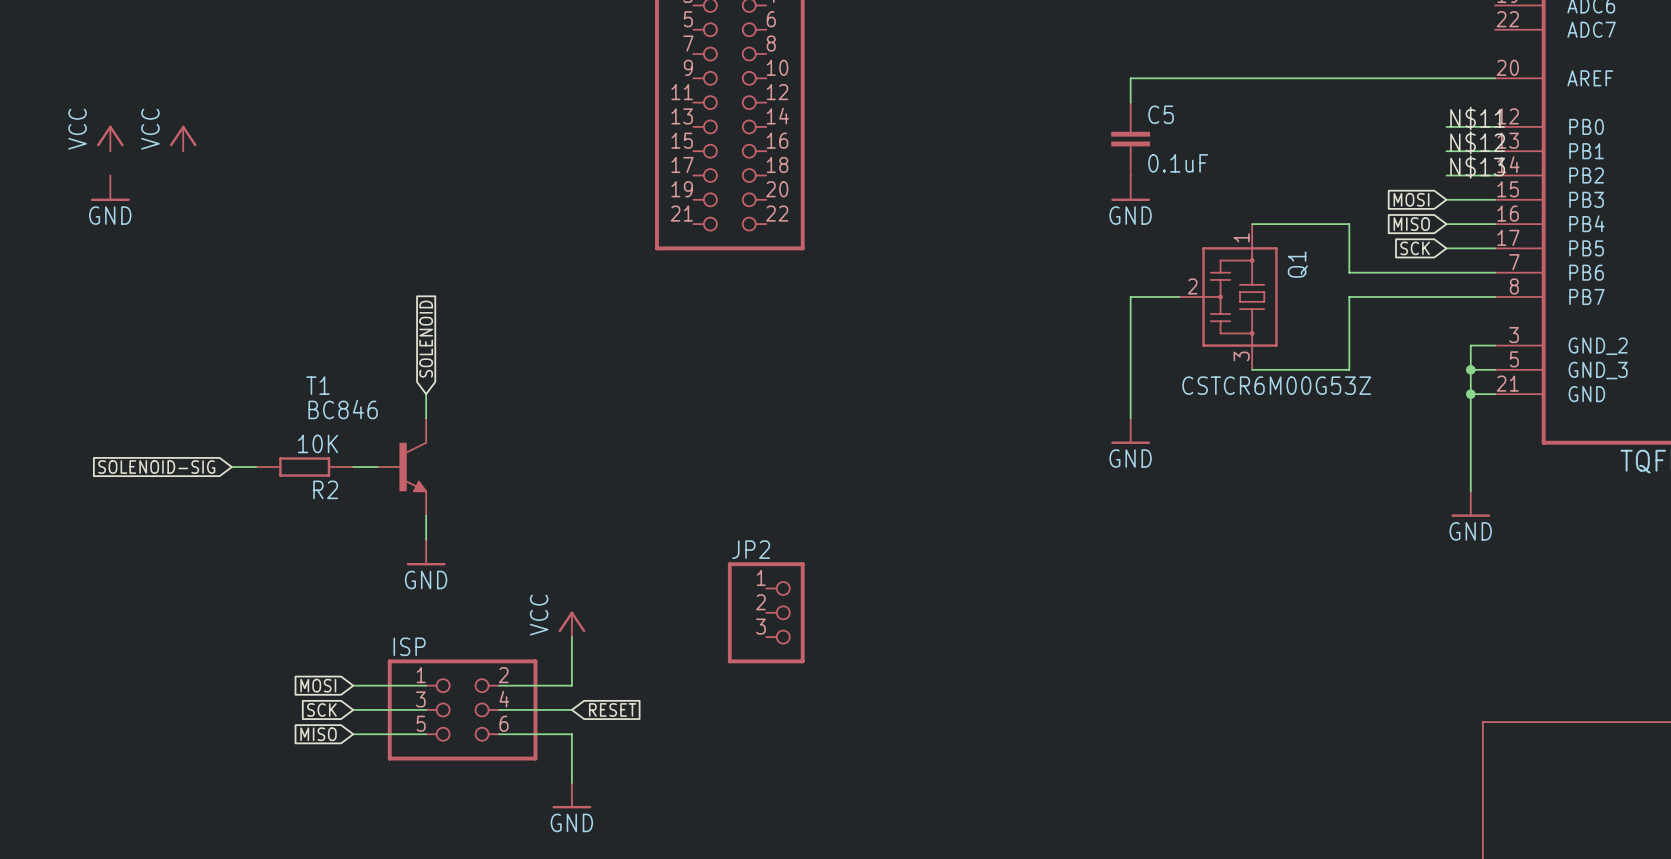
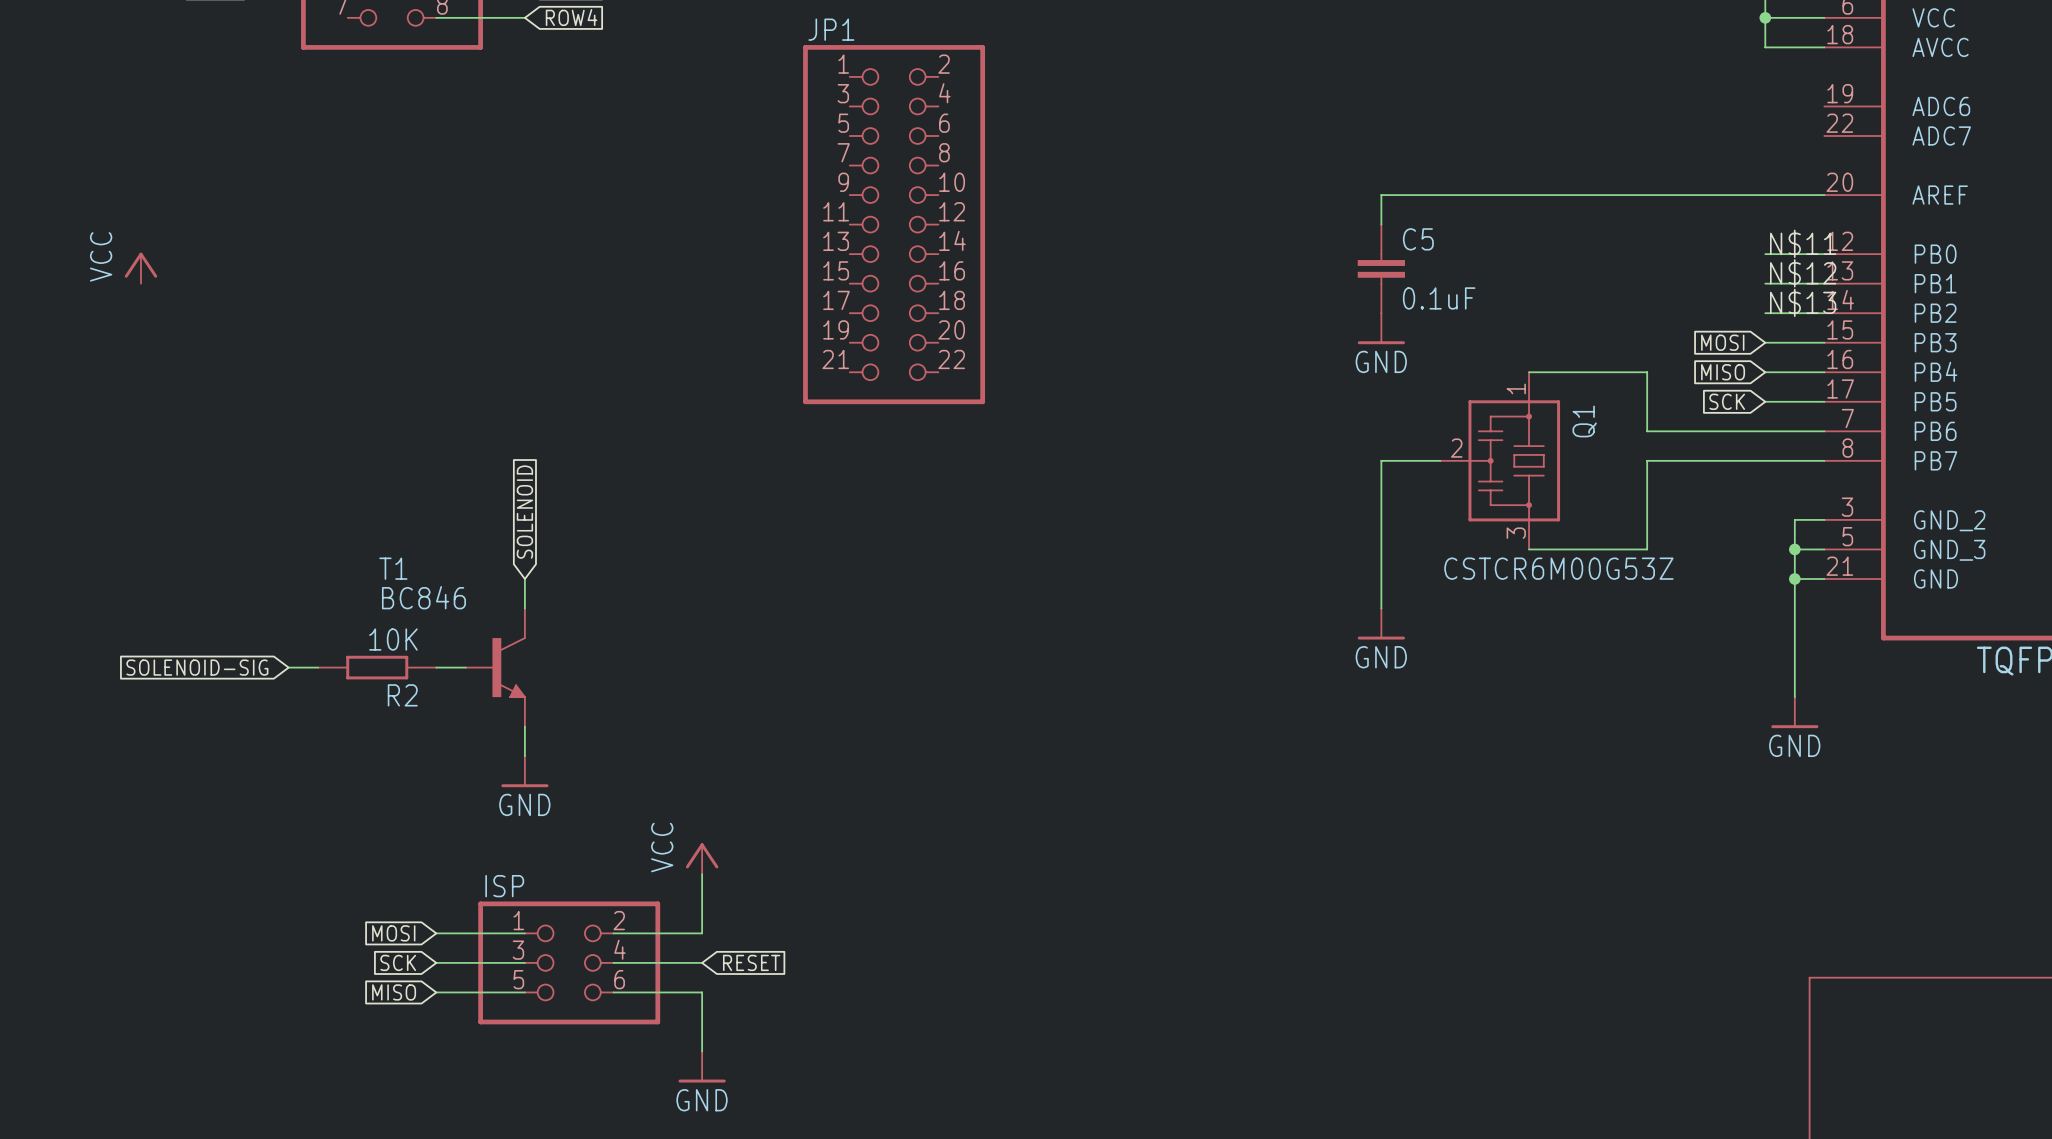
power symbol: VCC (183, 138) -> none
power symbol: GND (110, 188) -> none
JP2: (766, 612) -> none

